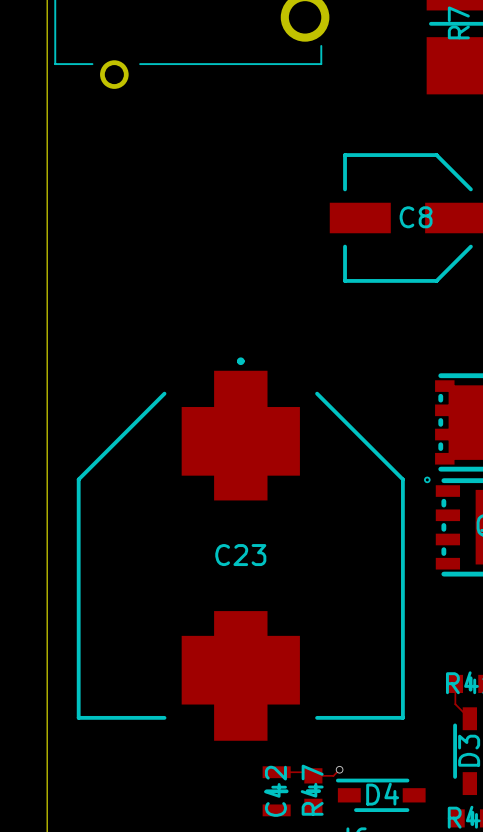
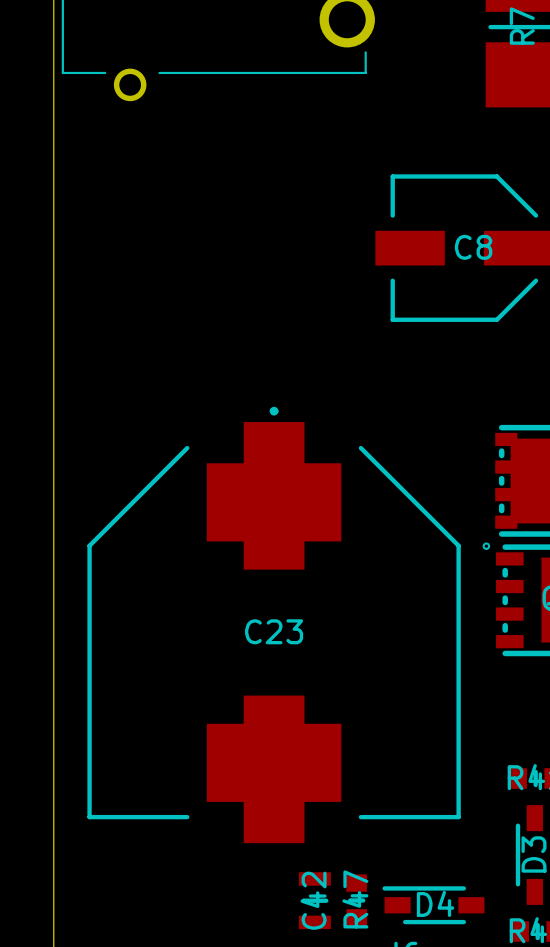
track: (455, 683) (455, 704) (469, 718) -> none
track: (339, 769) (333, 775) (313, 775) (309, 772) (276, 772) -> none
via: (339, 769) -> none

